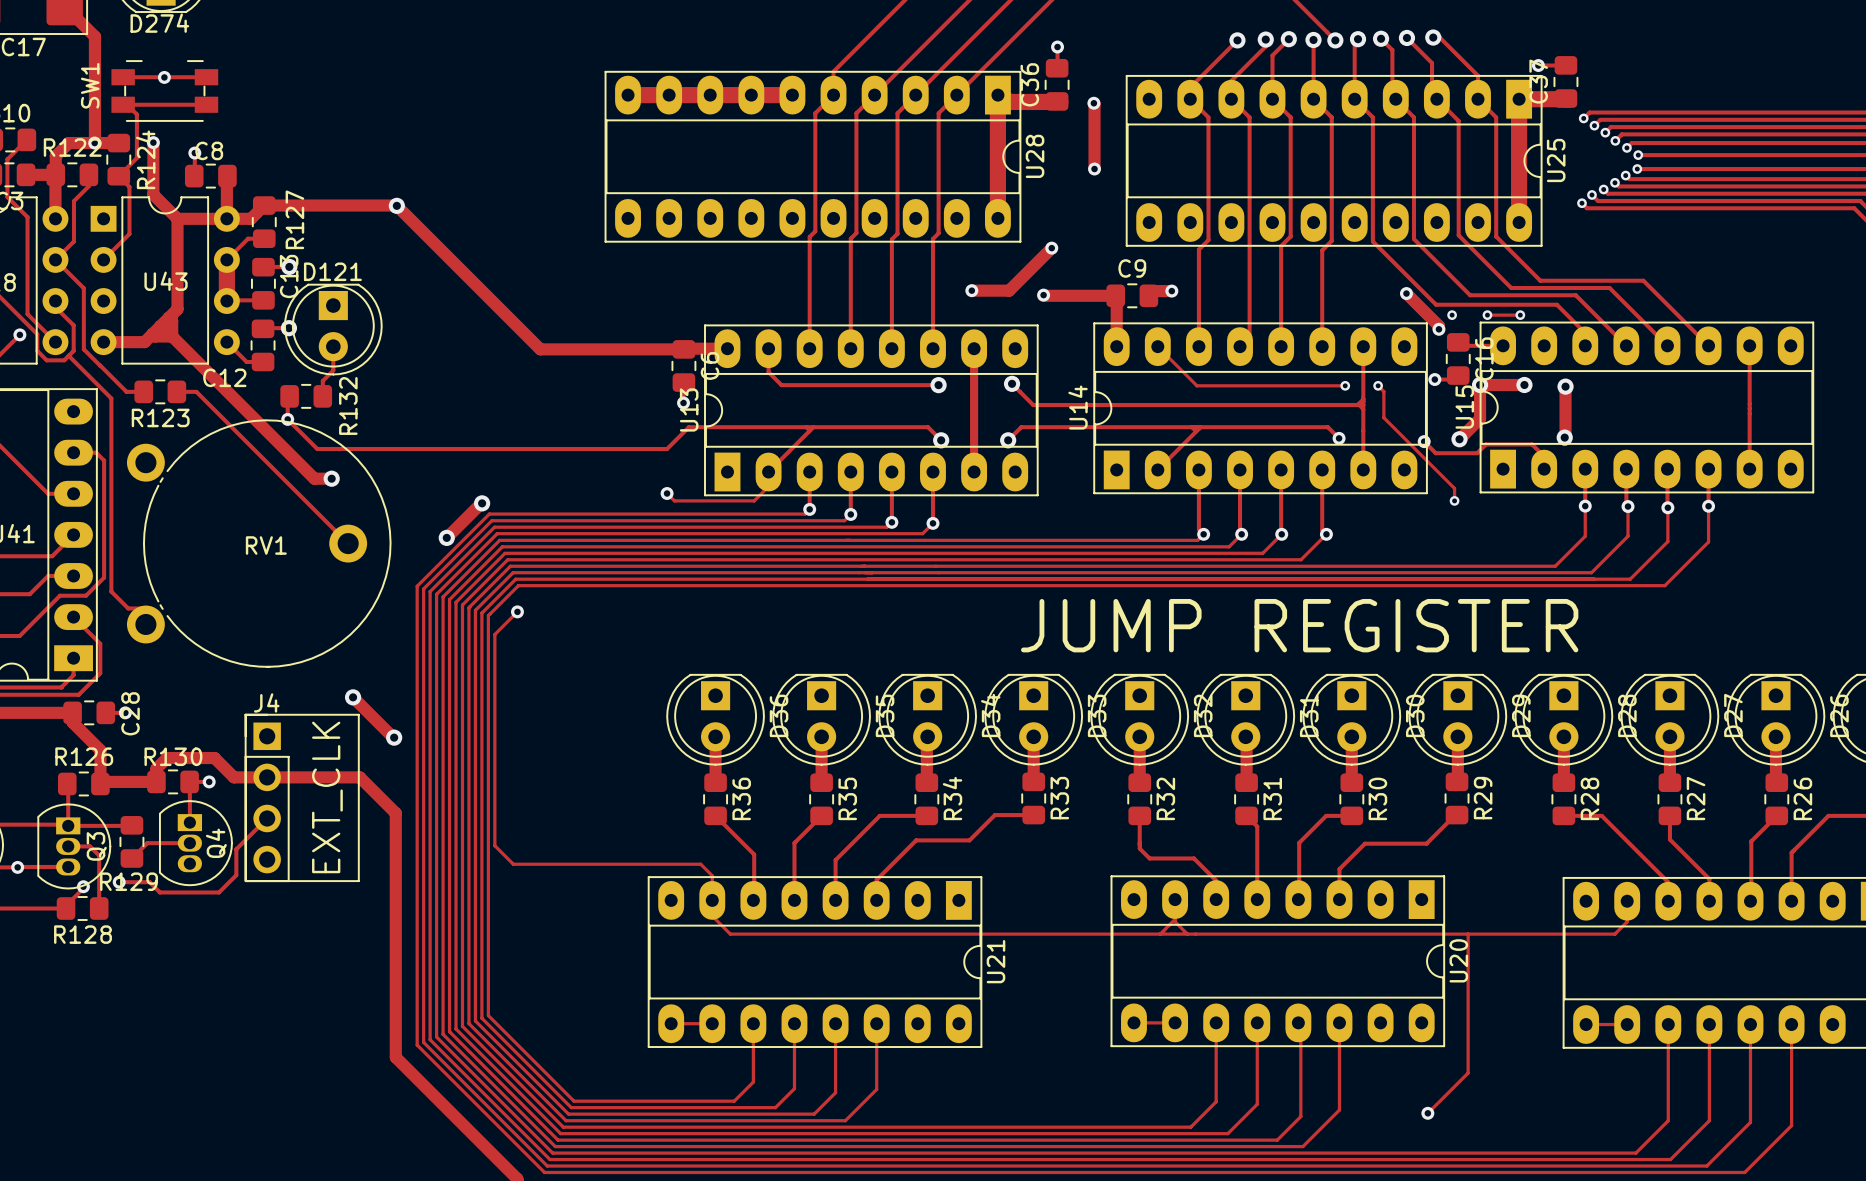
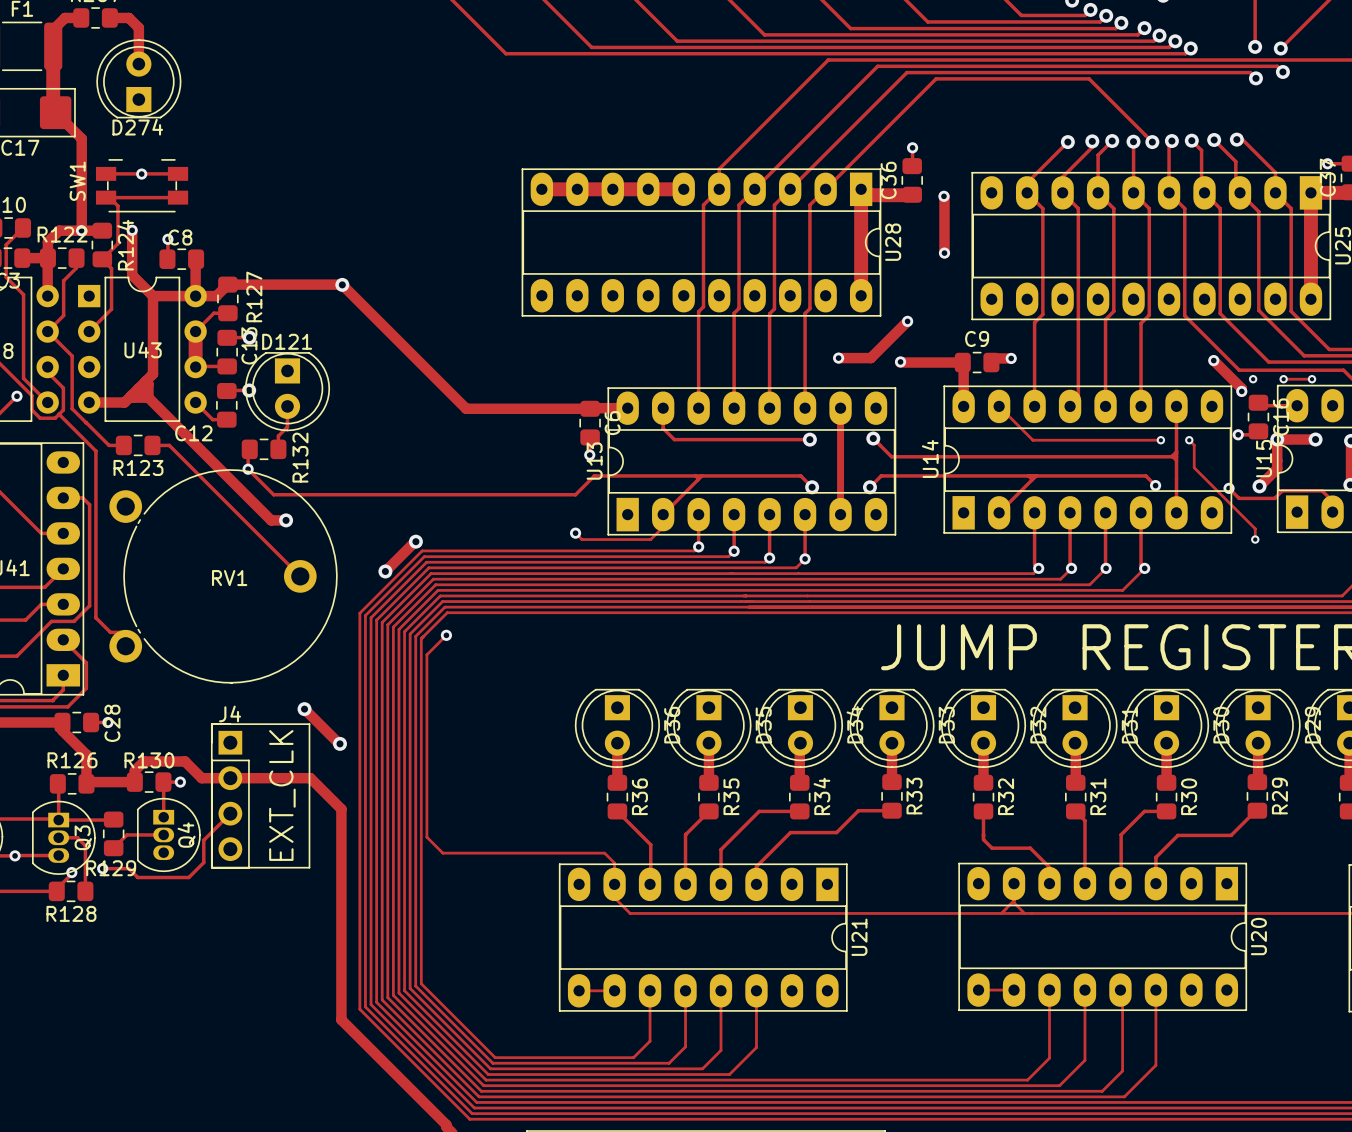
track: (1468, 934) (1468, 1073) (1427, 1113) -> none
via: (1427, 1113) -> none

